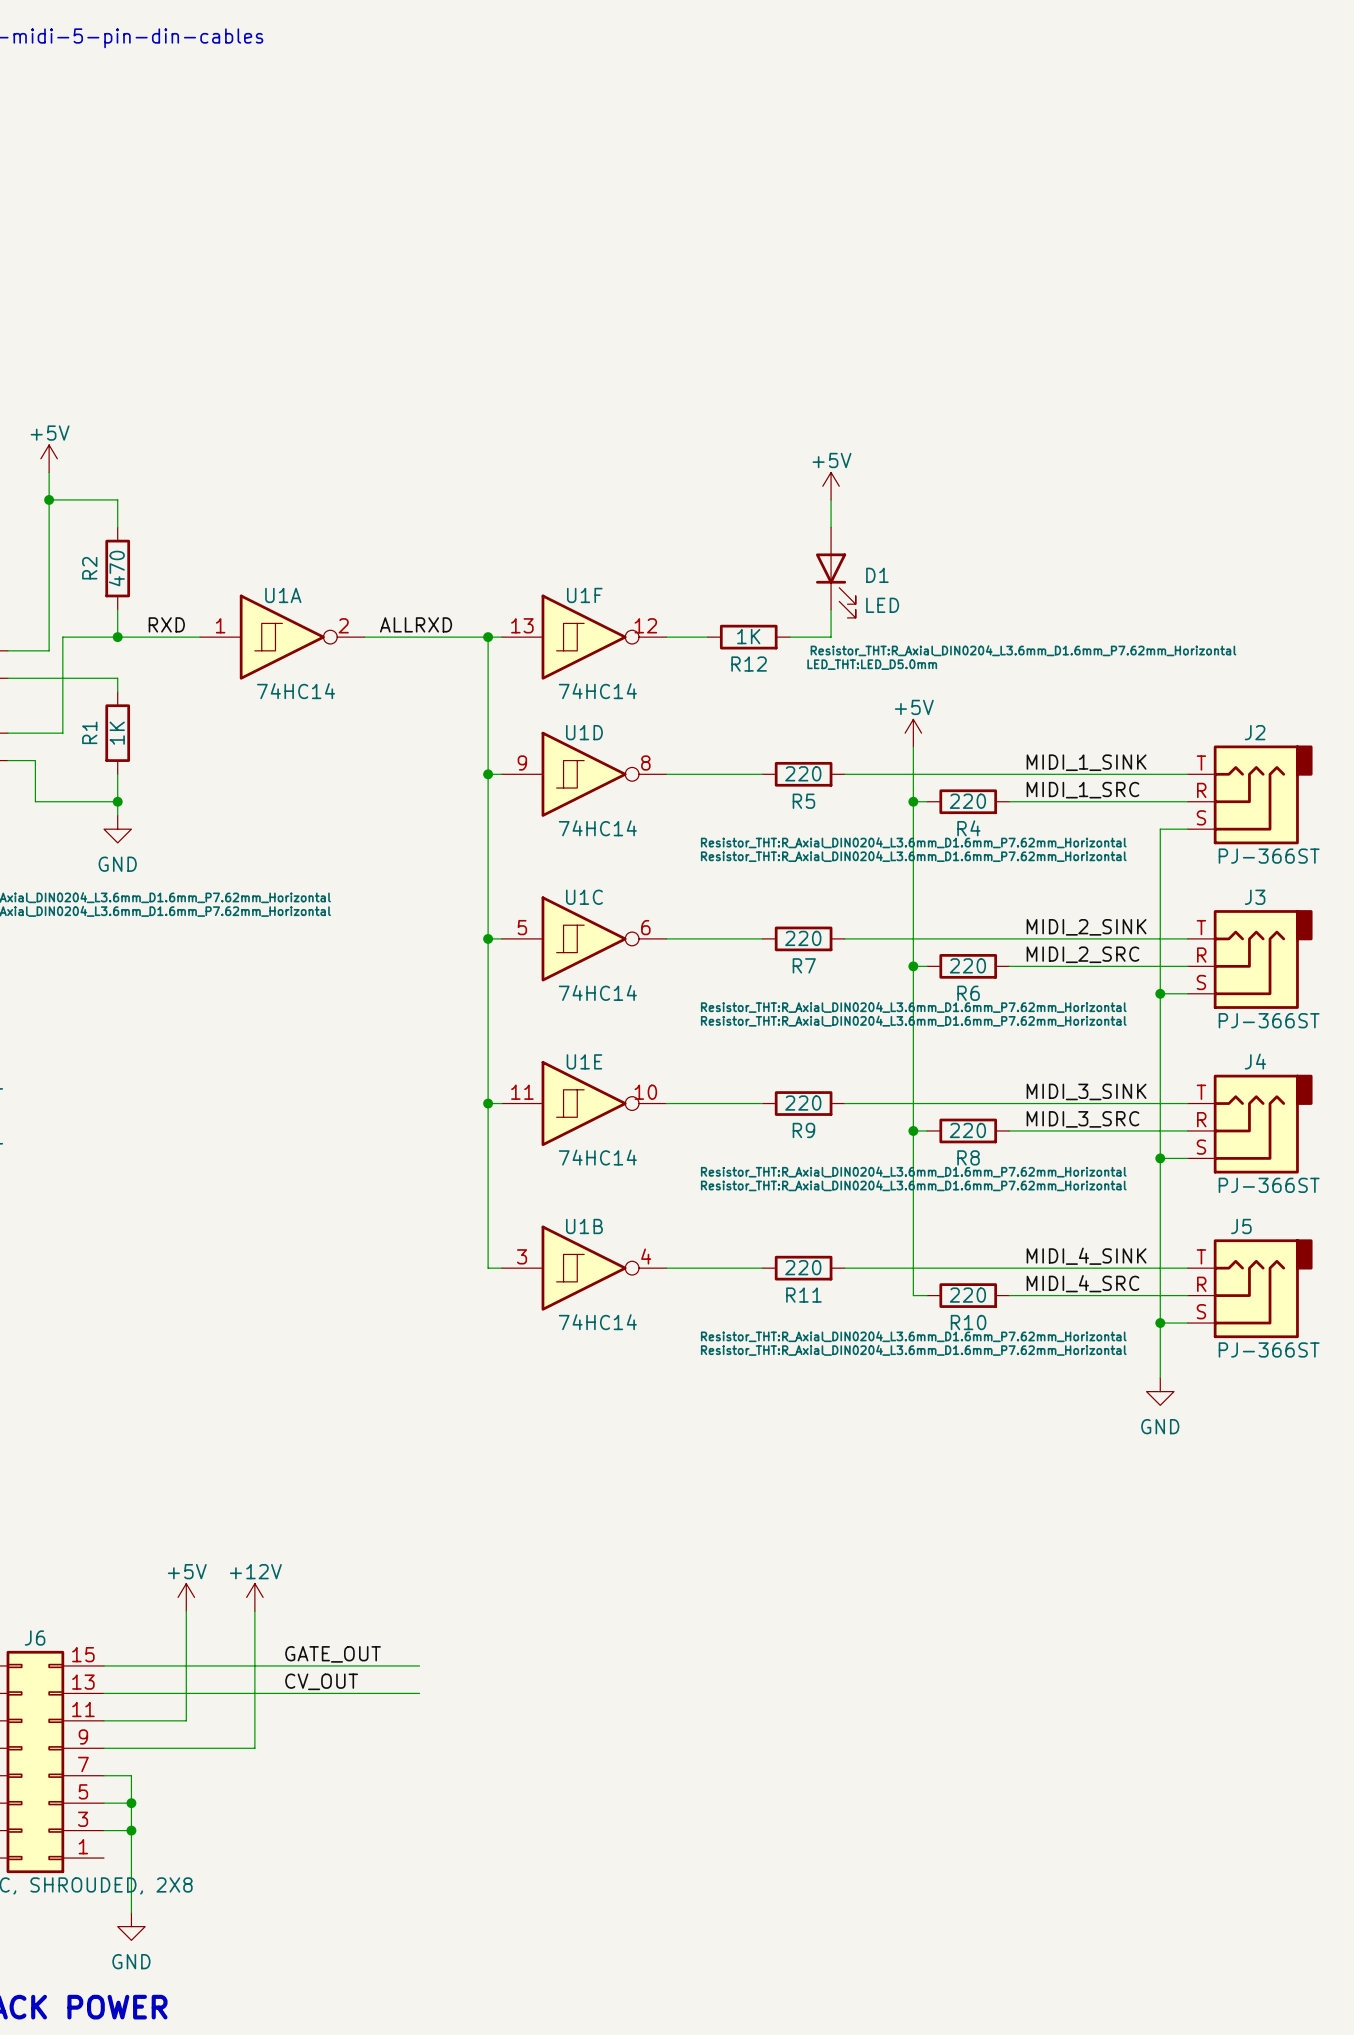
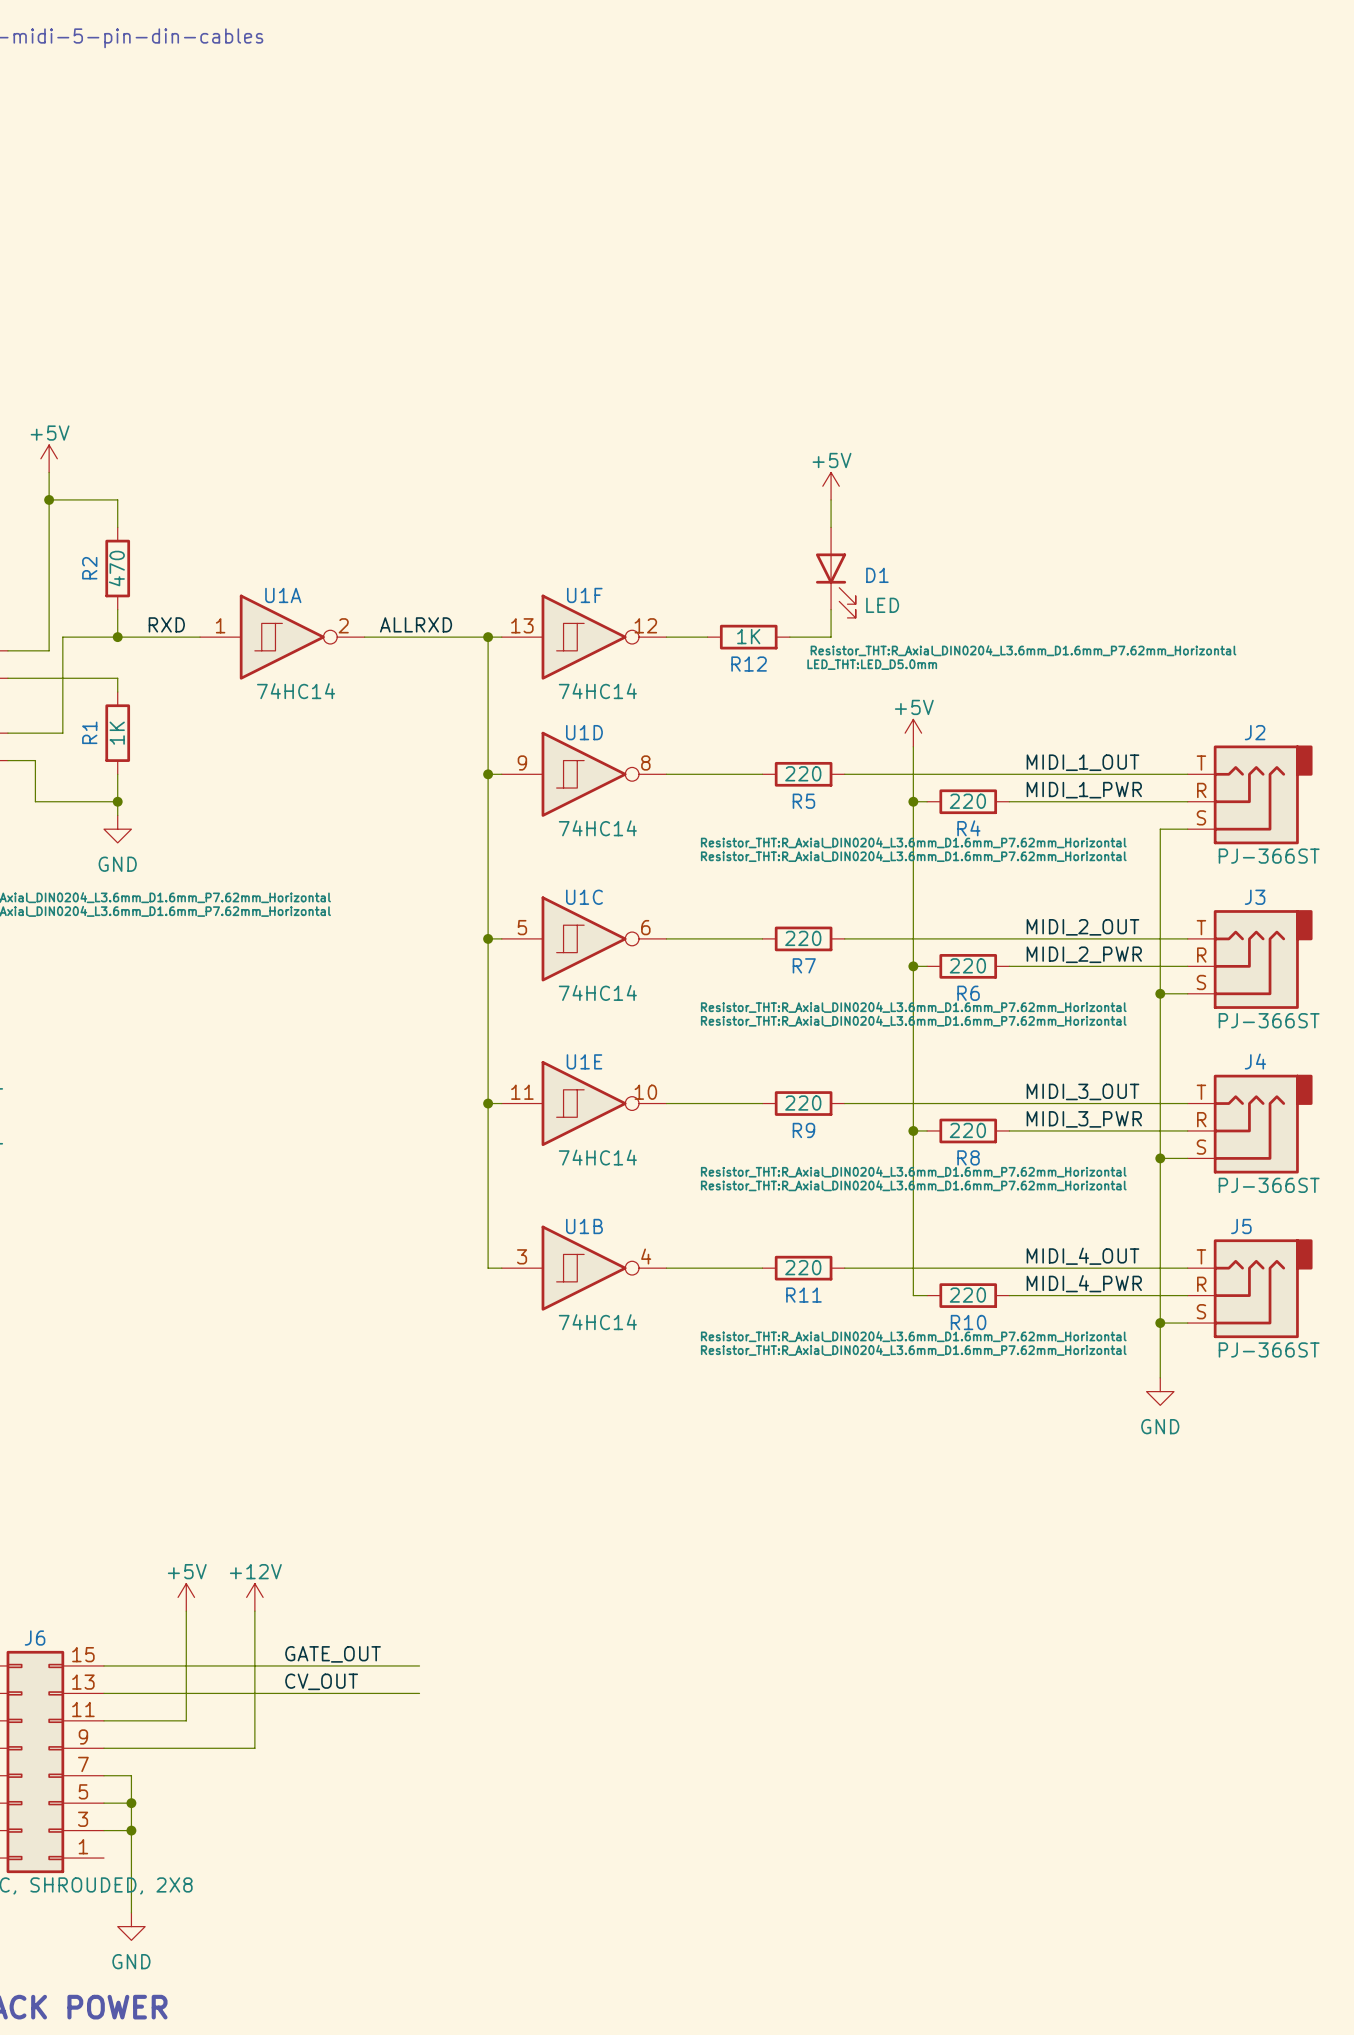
label: MIDI_1_SINK (1086, 762) -> MIDI_1_OUT (1082, 762)
label: MIDI_1_SRC (1082, 790) -> MIDI_1_PWR (1084, 790)
label: MIDI_2_SINK (1086, 927) -> MIDI_2_OUT (1082, 927)
label: MIDI_2_SRC (1082, 954) -> MIDI_2_PWR (1084, 954)
label: MIDI_3_SINK (1086, 1091) -> MIDI_3_OUT (1082, 1091)
label: MIDI_3_SRC (1082, 1119) -> MIDI_3_PWR (1084, 1119)
label: MIDI_4_SINK (1086, 1256) -> MIDI_4_OUT (1082, 1256)
label: MIDI_4_SRC (1082, 1283) -> MIDI_4_PWR (1084, 1283)

